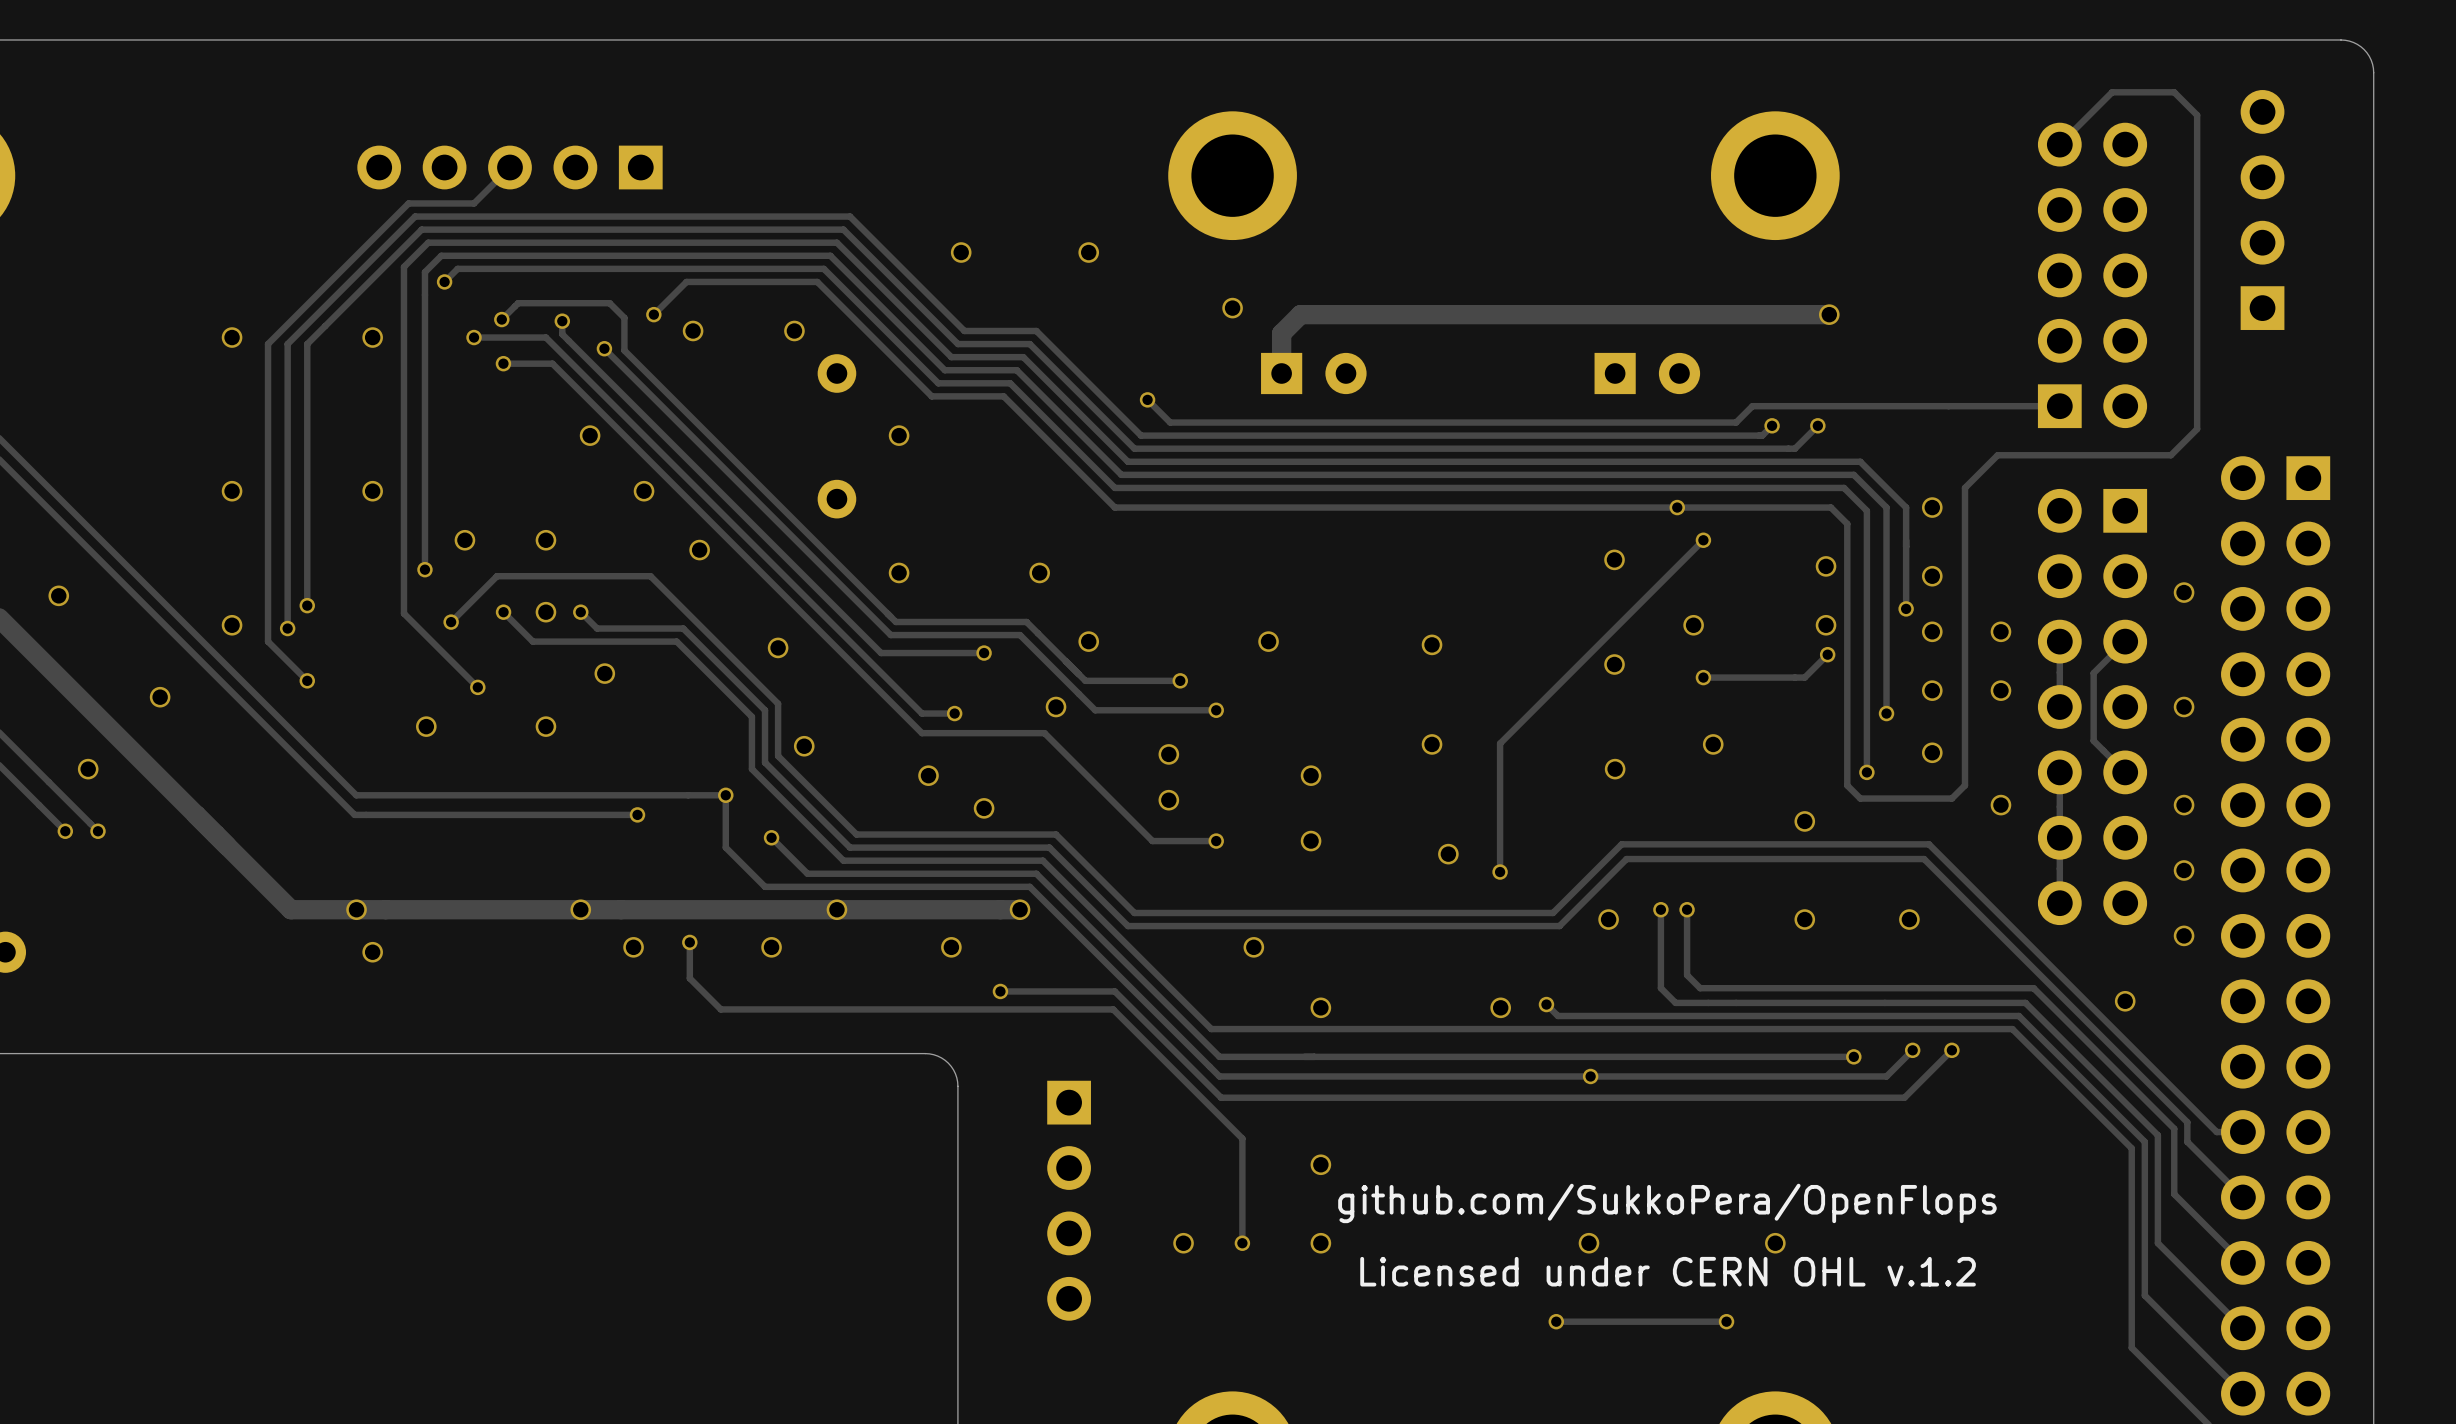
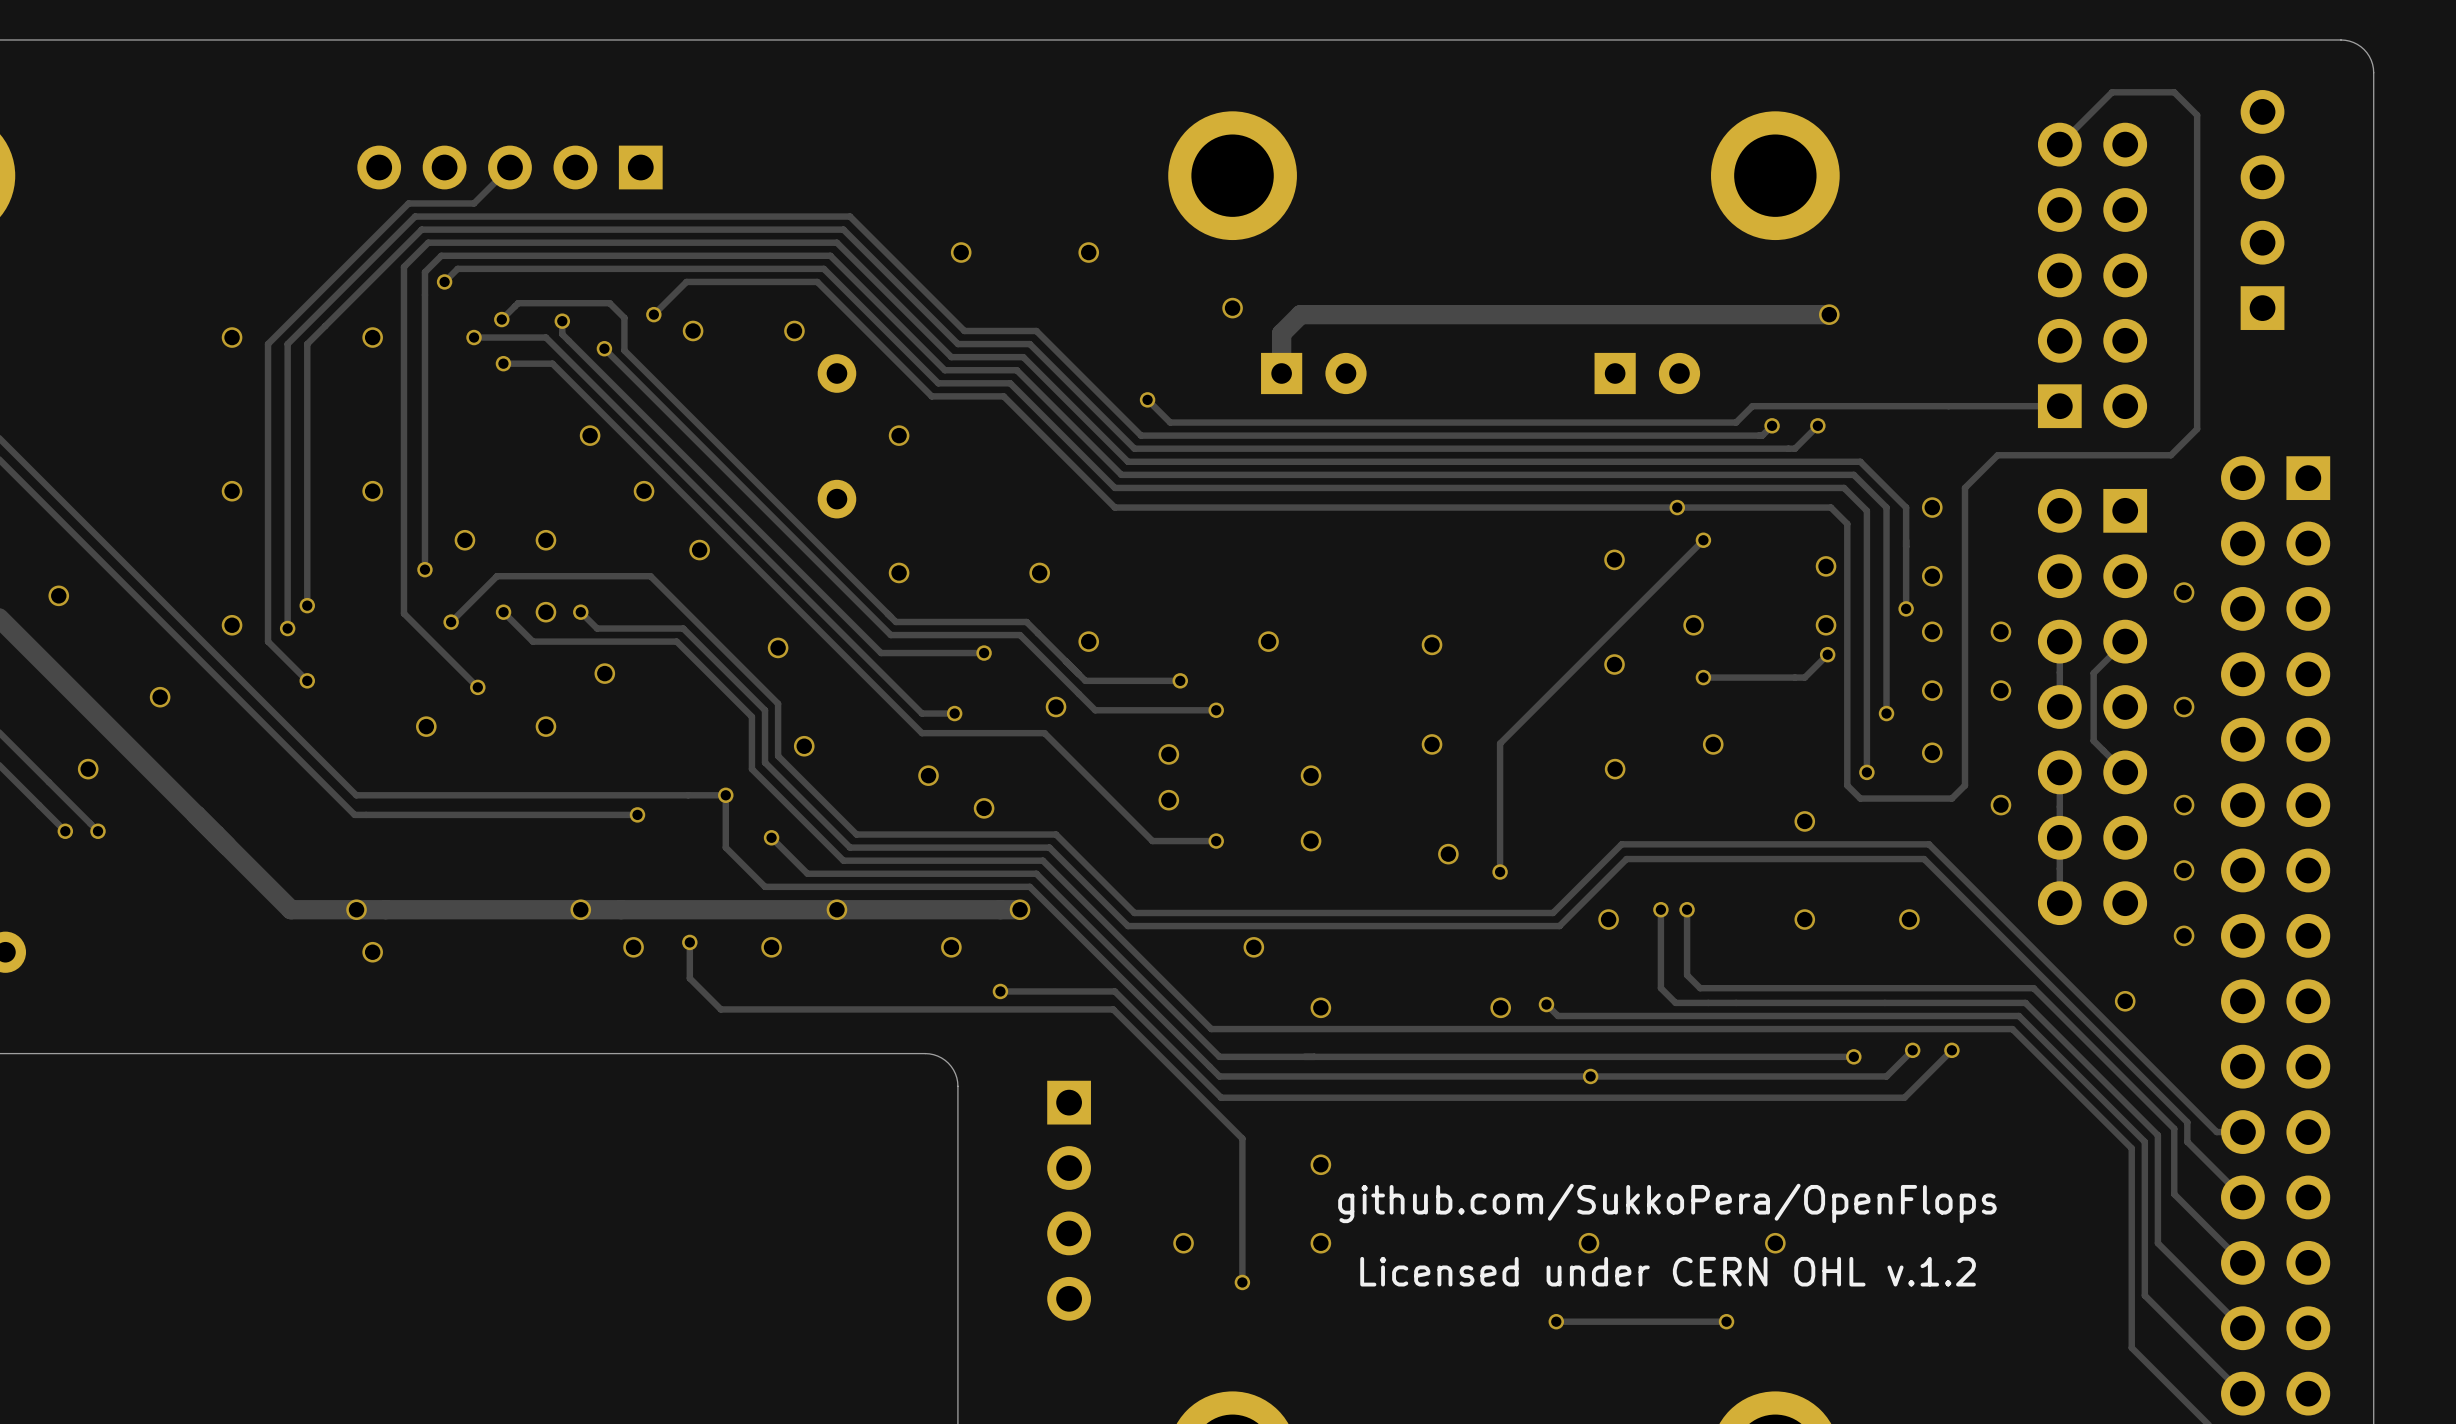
track: none -> (1242, 1243) (1242, 1282)
via position: (1242, 1243) -> (1242, 1282)

